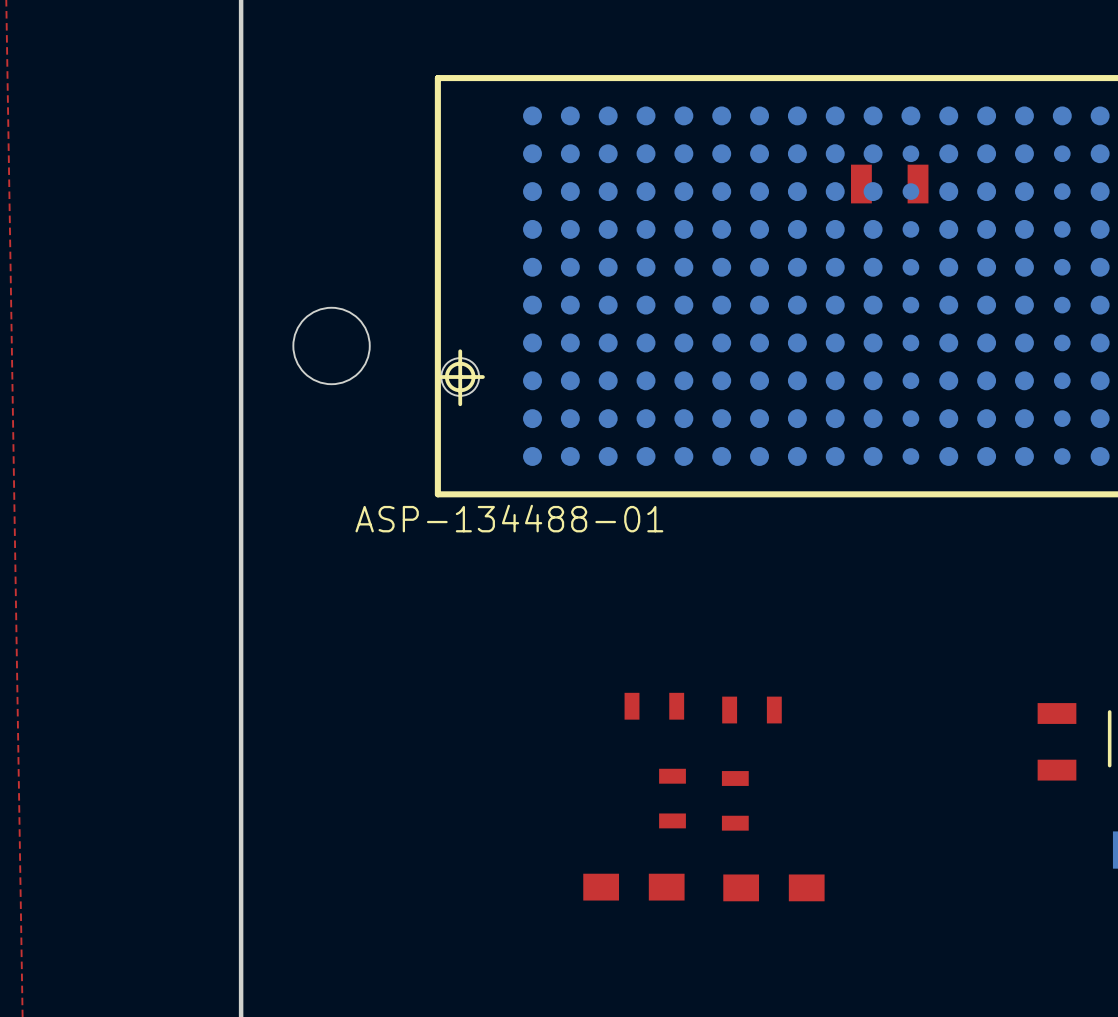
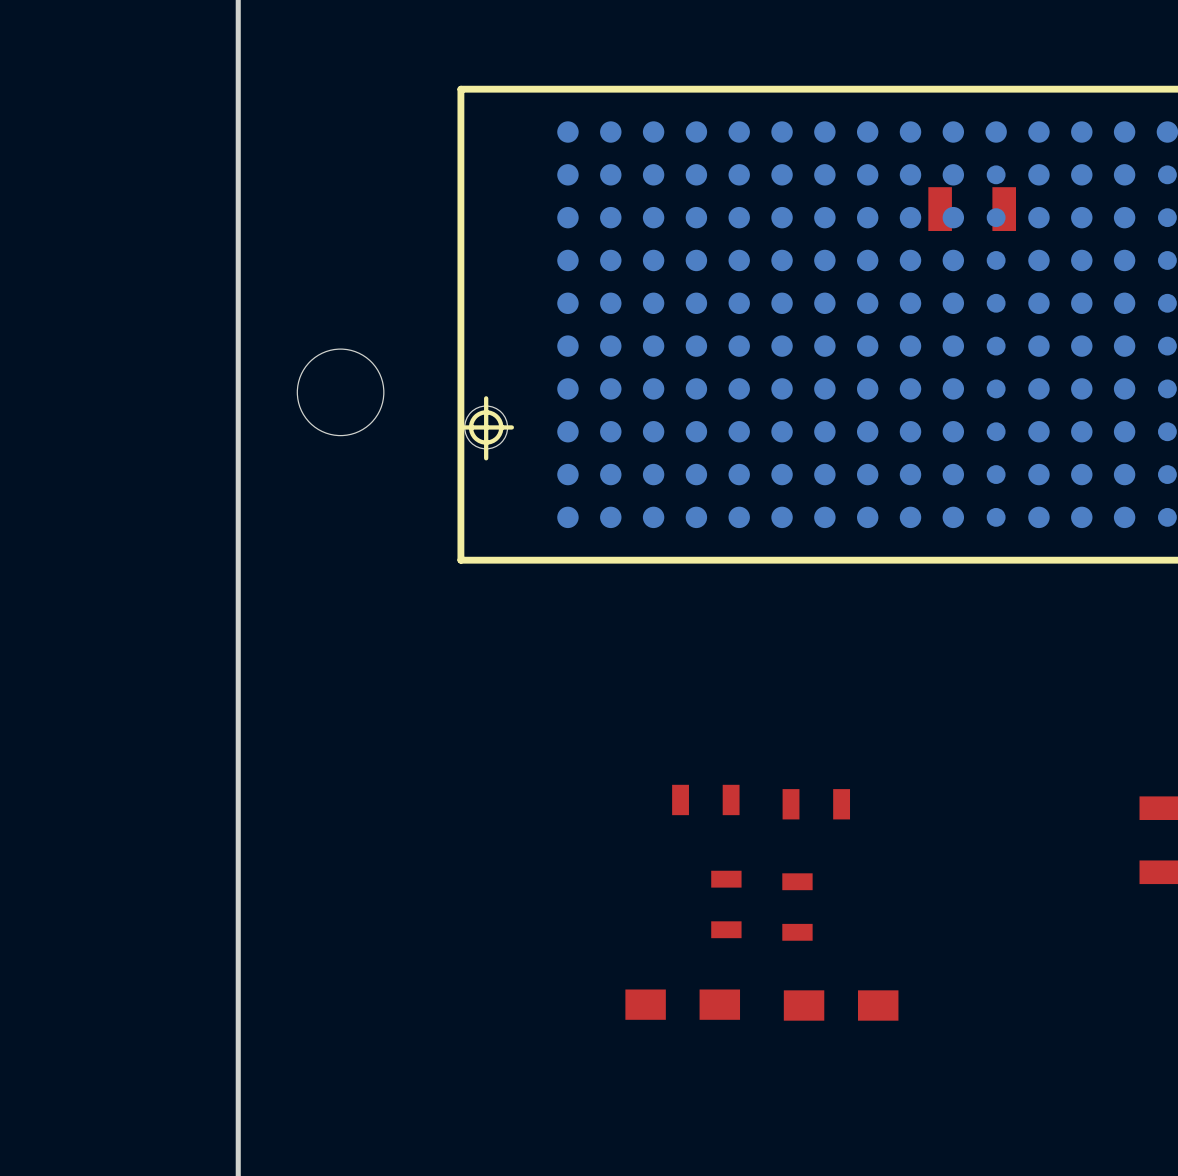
part value: ASP-134488-01 (509, 518) -> none

